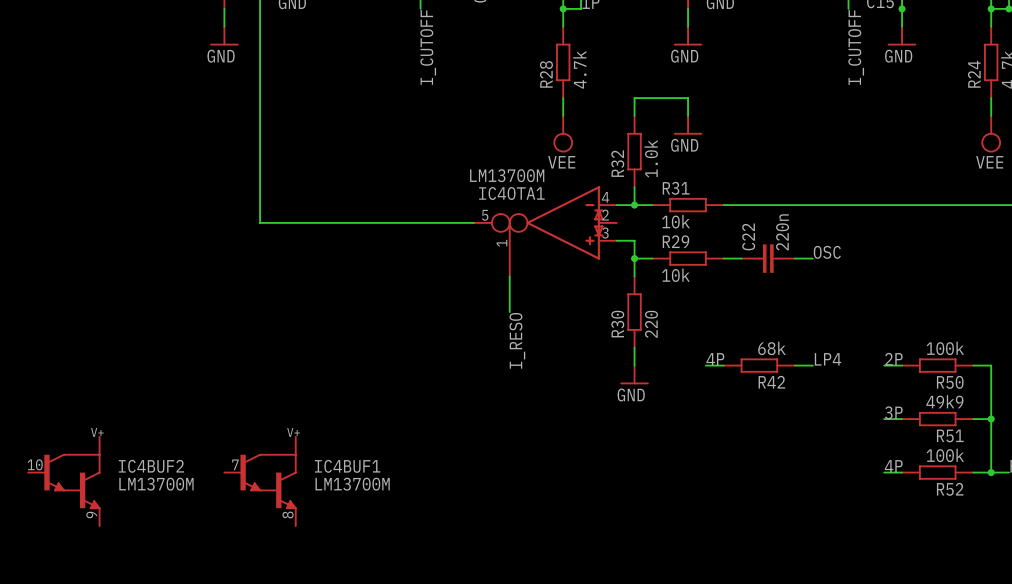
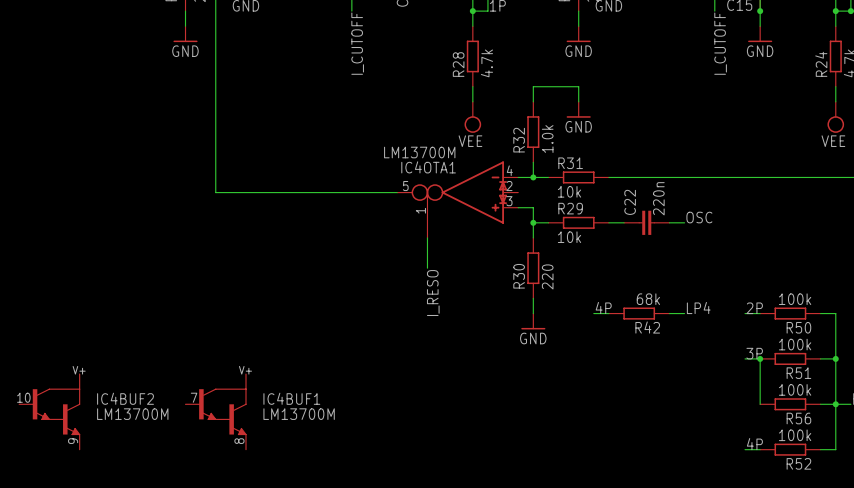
R51 value: 49k9 (944, 401) -> 100k (795, 344)
junction: none -> (760, 358)
label position: 4P (893, 466) -> 4P (754, 444)
wire: (884, 472) (902, 472) -> (760, 358) (760, 404)
wire: none -> (835, 404) (835, 449) (820, 449)
R52 name: R52 (950, 489) -> R56 (798, 418)
wire: none -> (745, 449) (760, 449)
R52: none -> 100k (790, 449)

